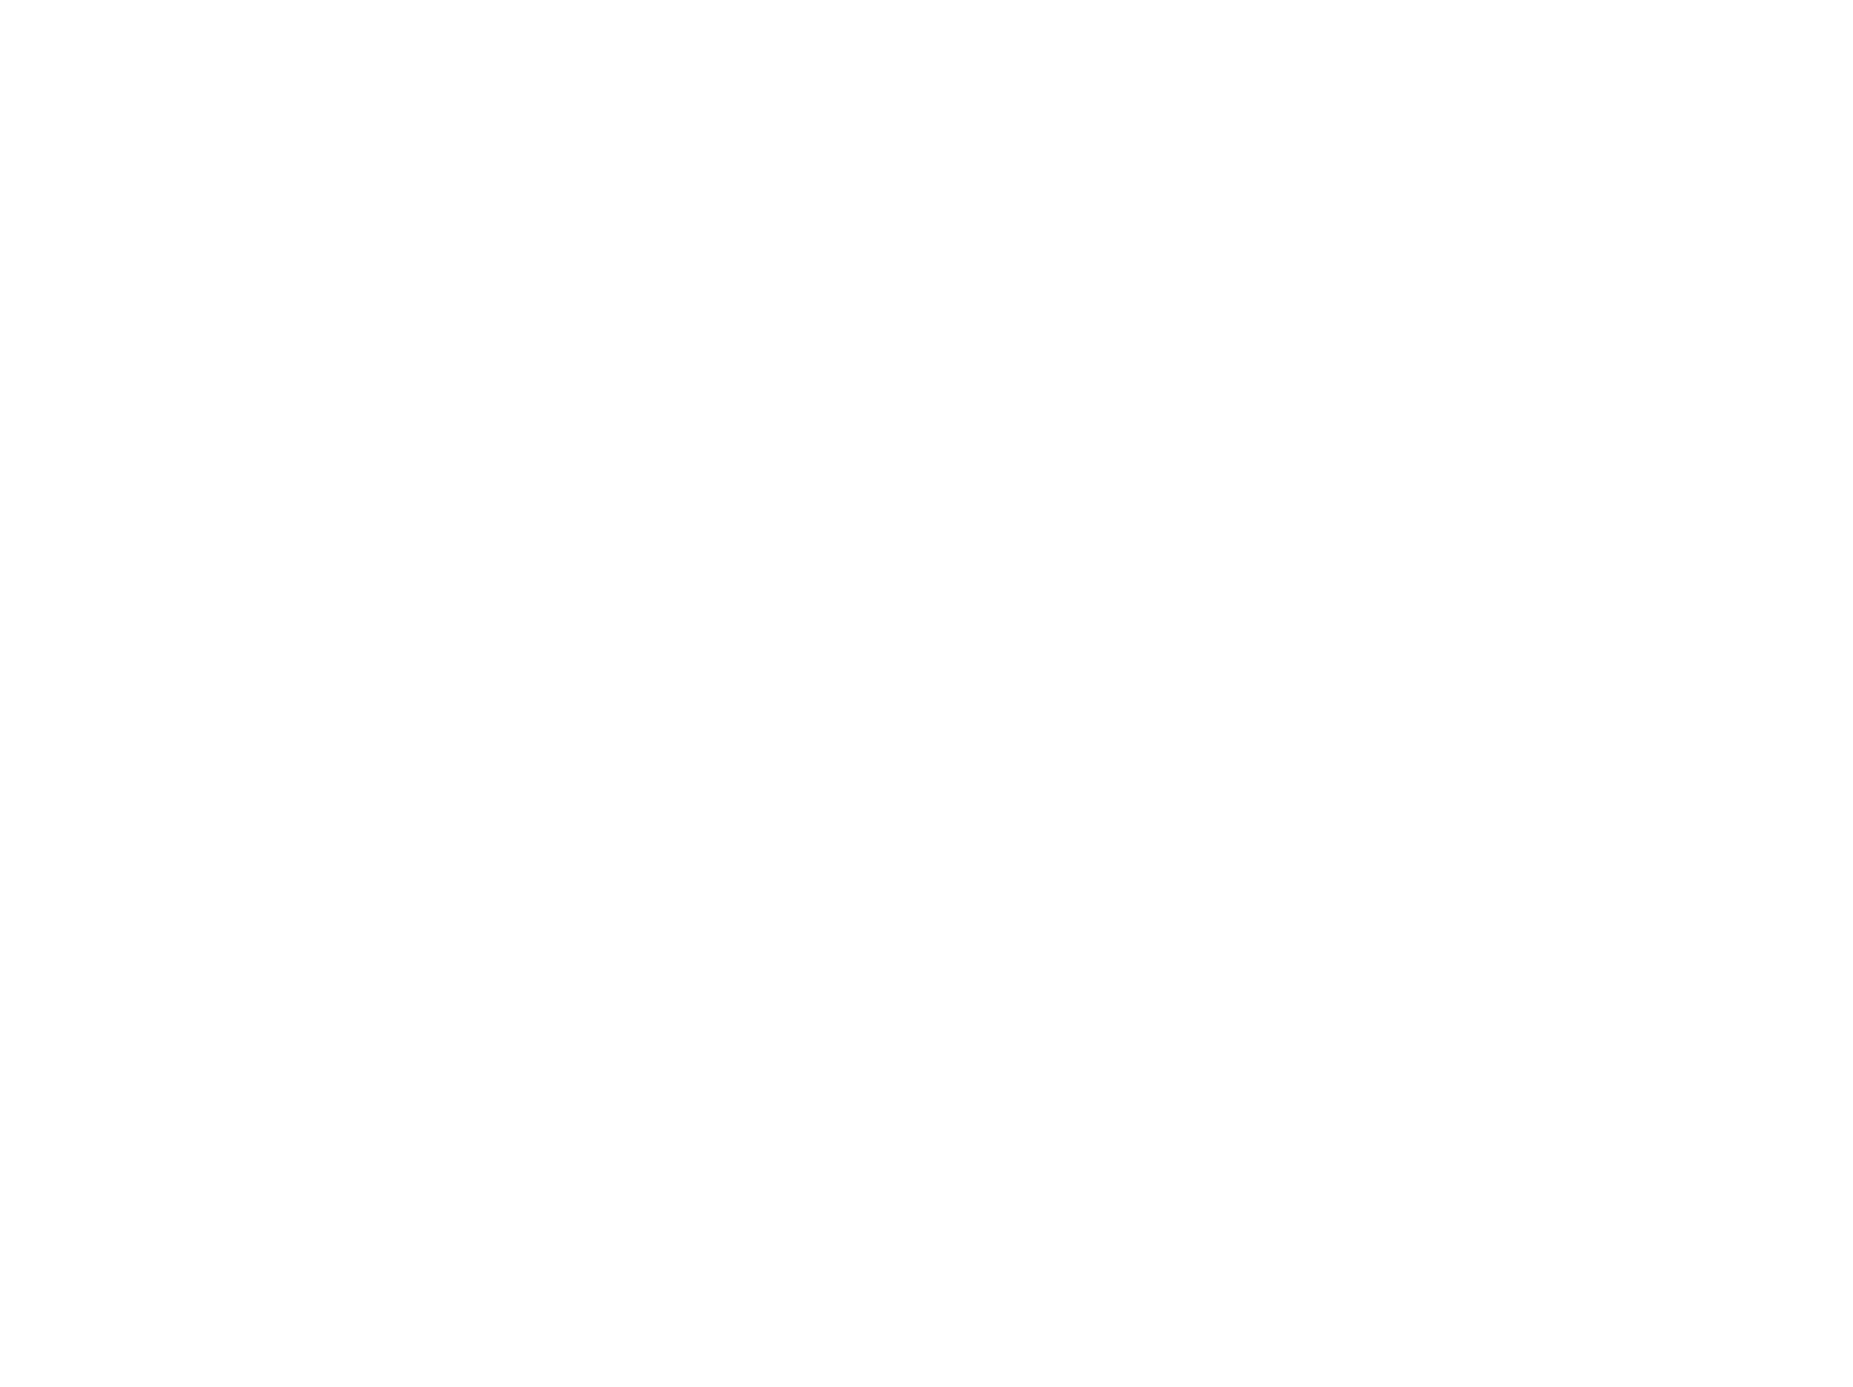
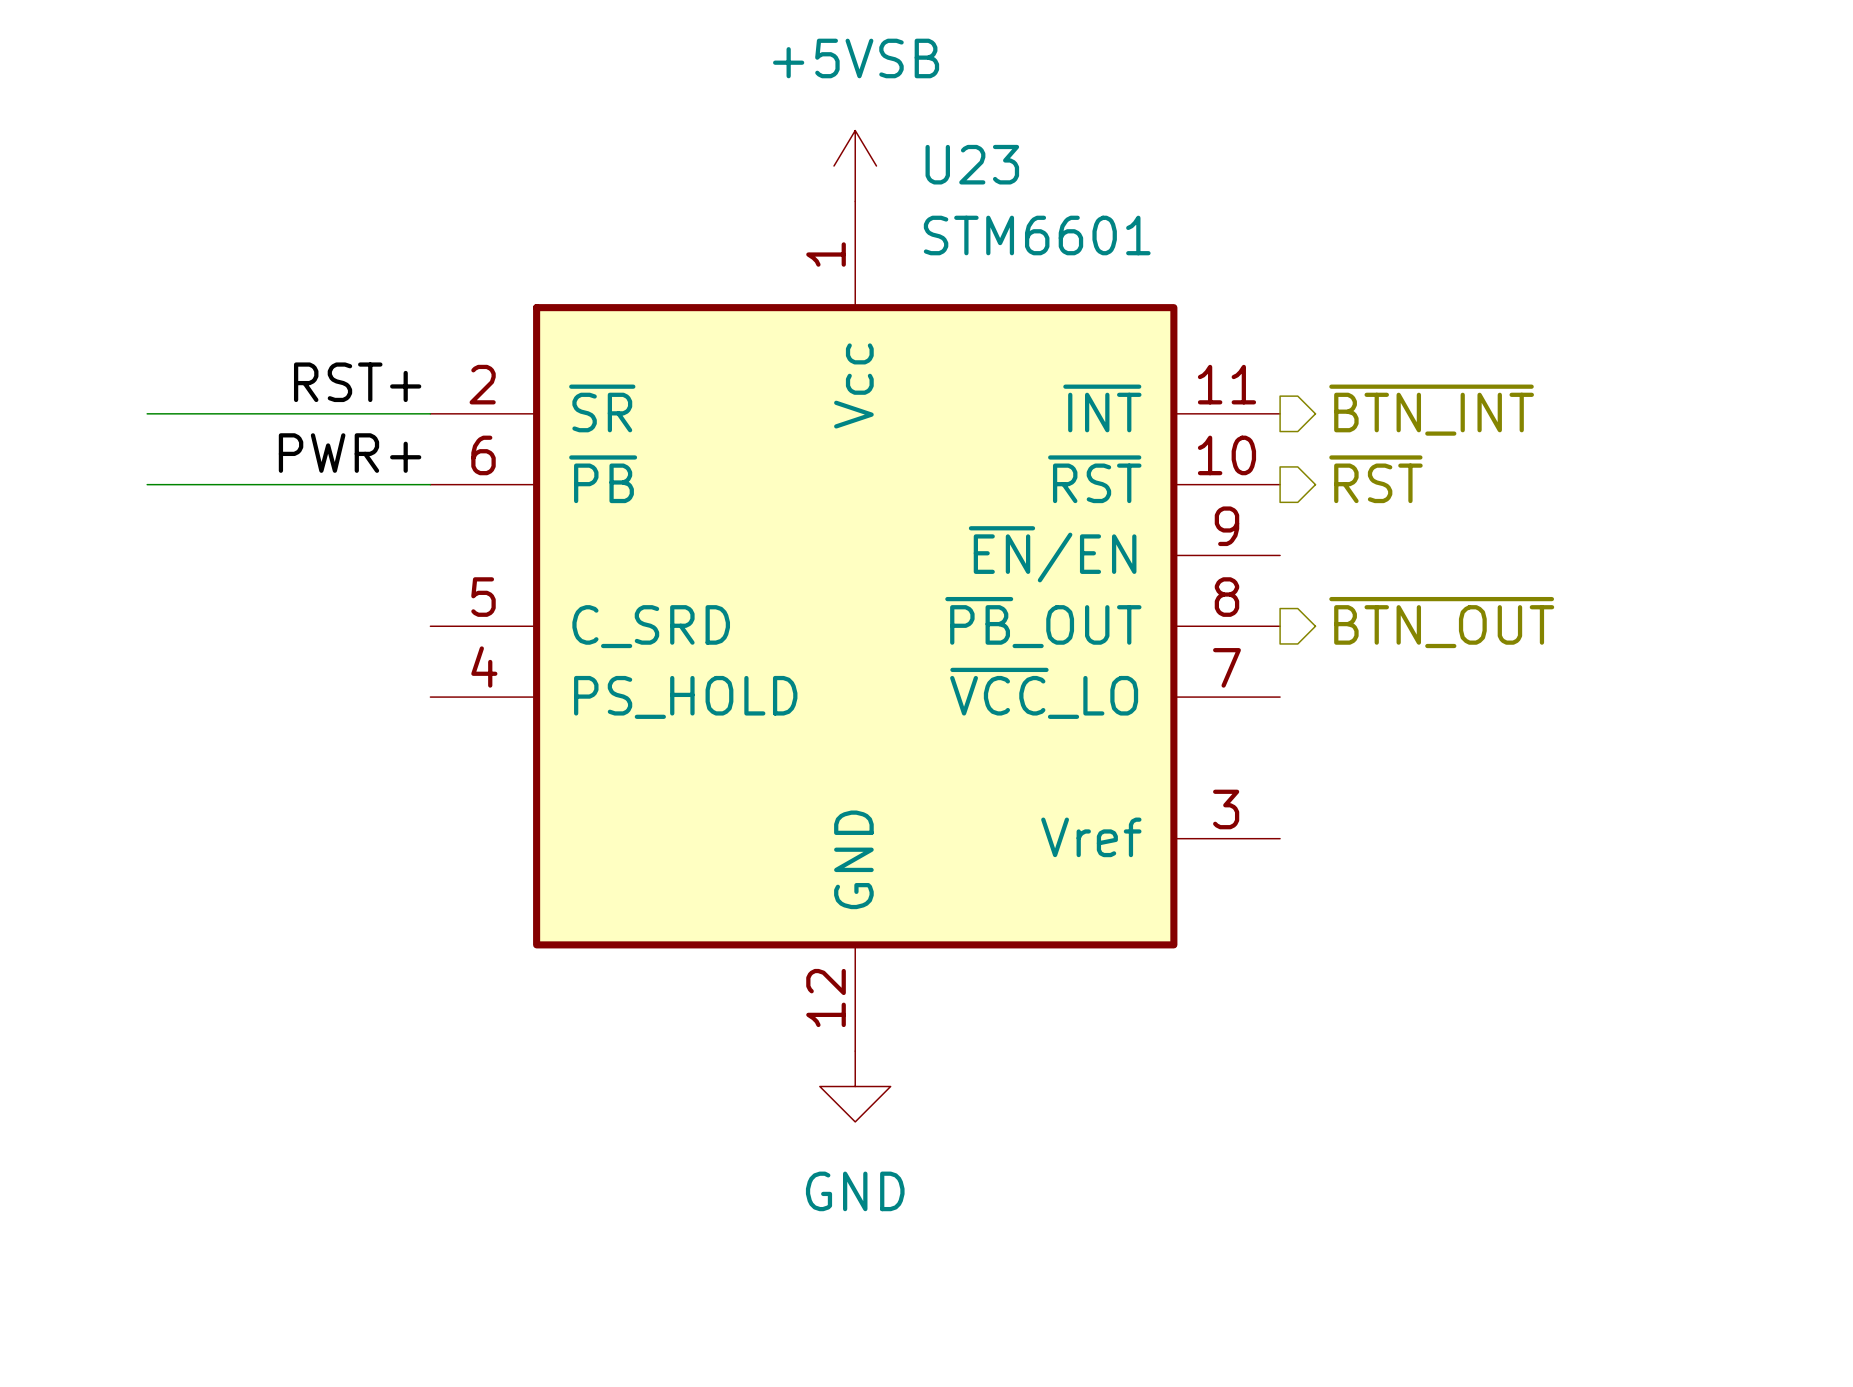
power symbol: none -> +5VSB (855, 166)
label: none -> RST+ (357, 382)
hierarchical label: none -> ~{BTN_INT} (1431, 410)
wire: none -> (147, 413) (430, 413)
label: none -> PWR+ (350, 453)
hierarchical label: none -> ~{RST} (1375, 479)
wire: none -> (147, 484) (430, 484)
hierarchical label: none -> ~{BTN_OUT} (1441, 622)
U23: none -> STM6601 (855, 626)
power symbol: none -> GND (855, 1086)

